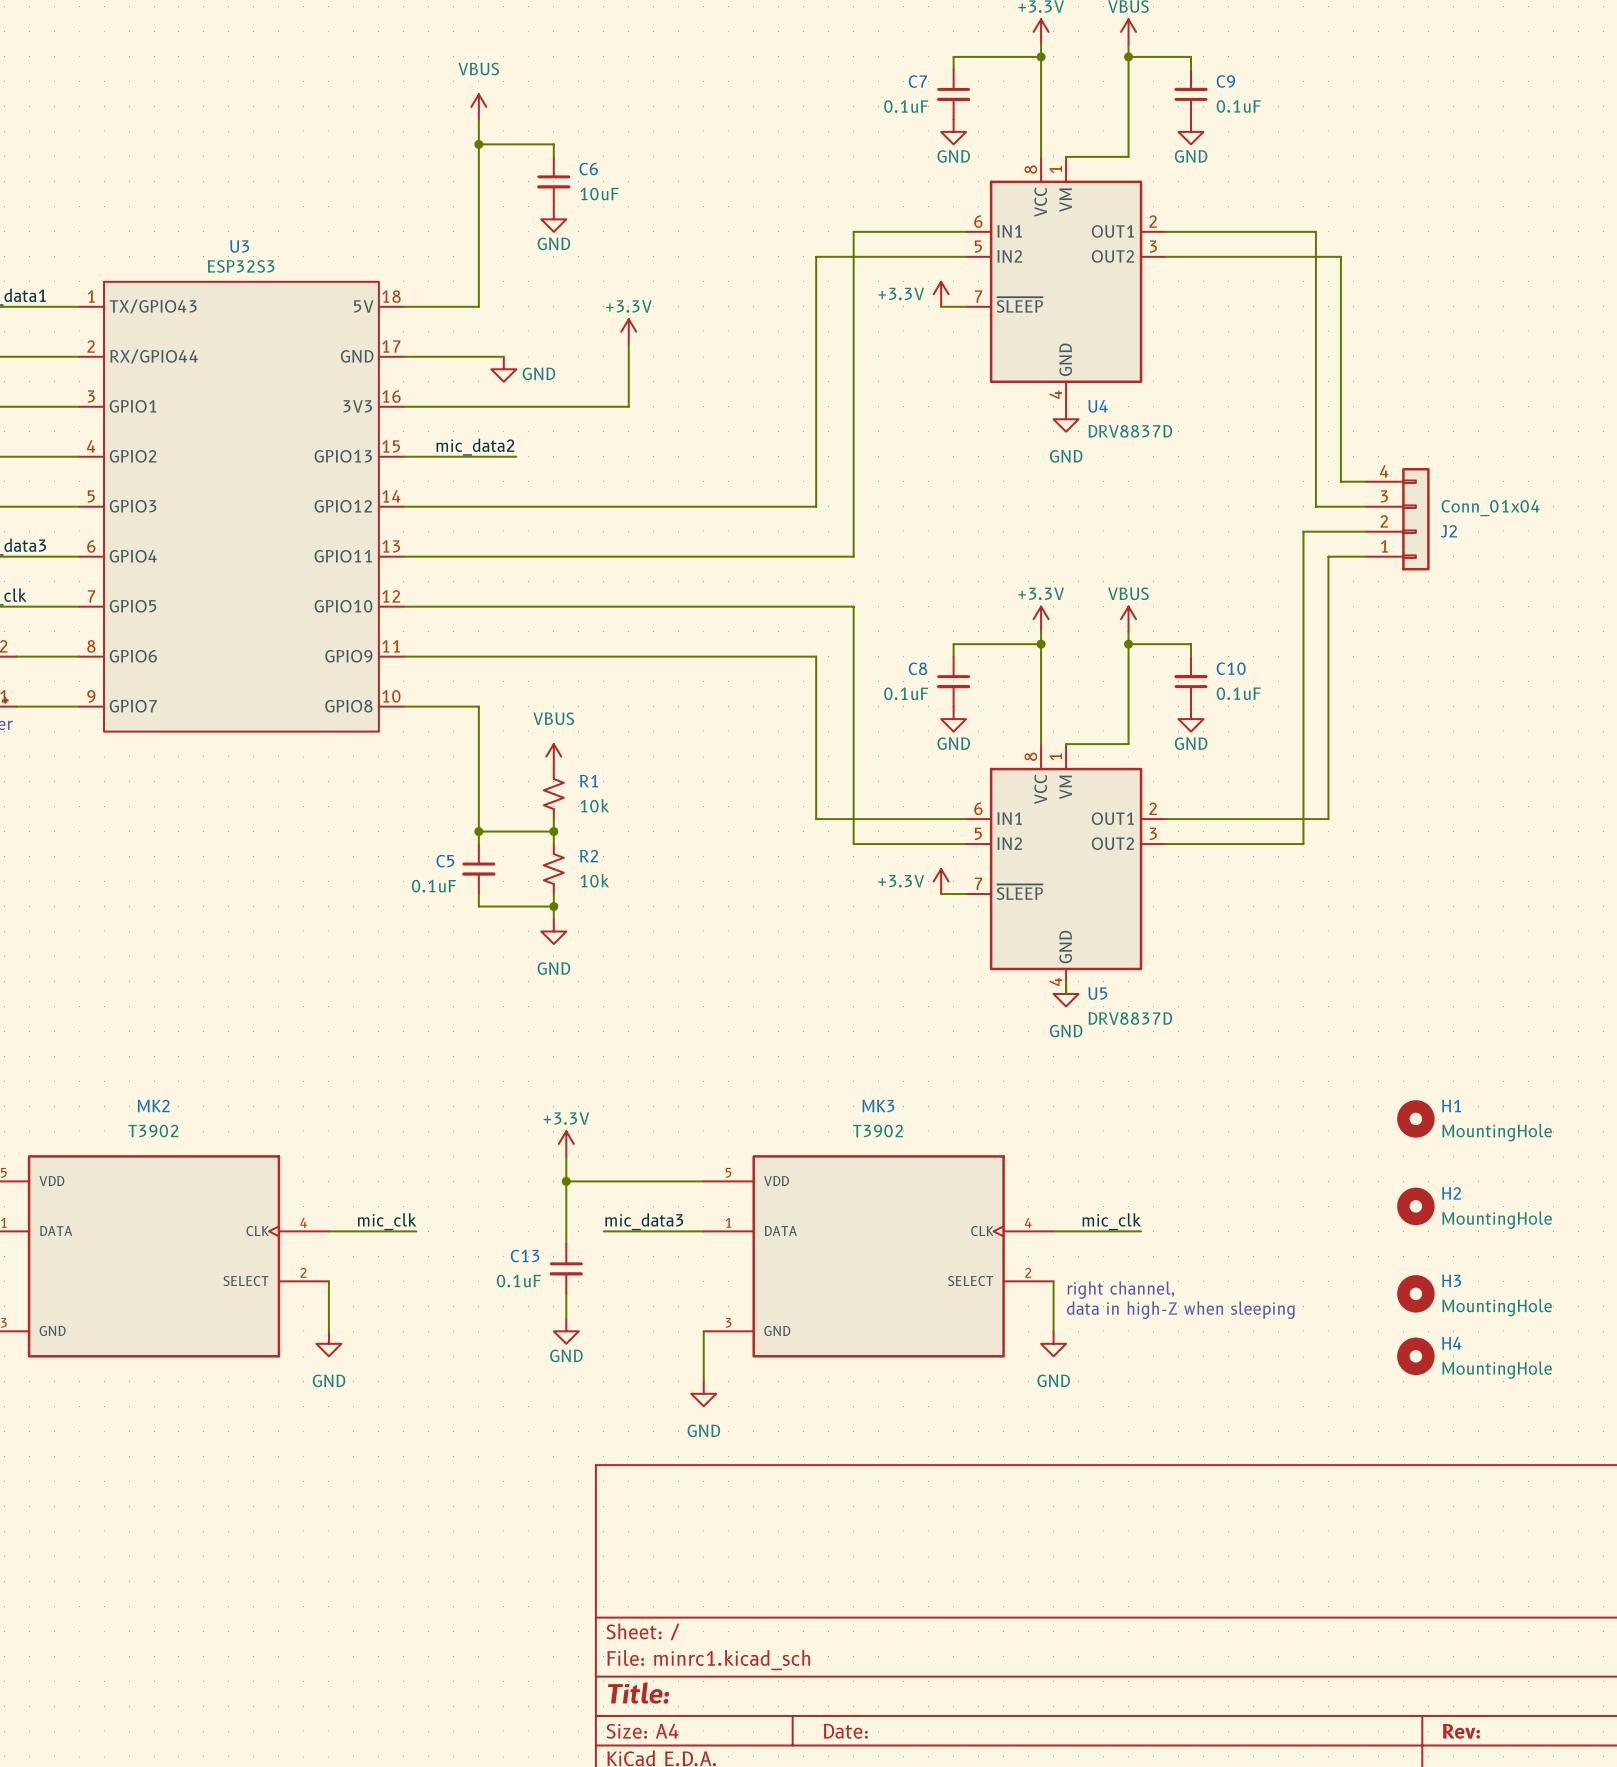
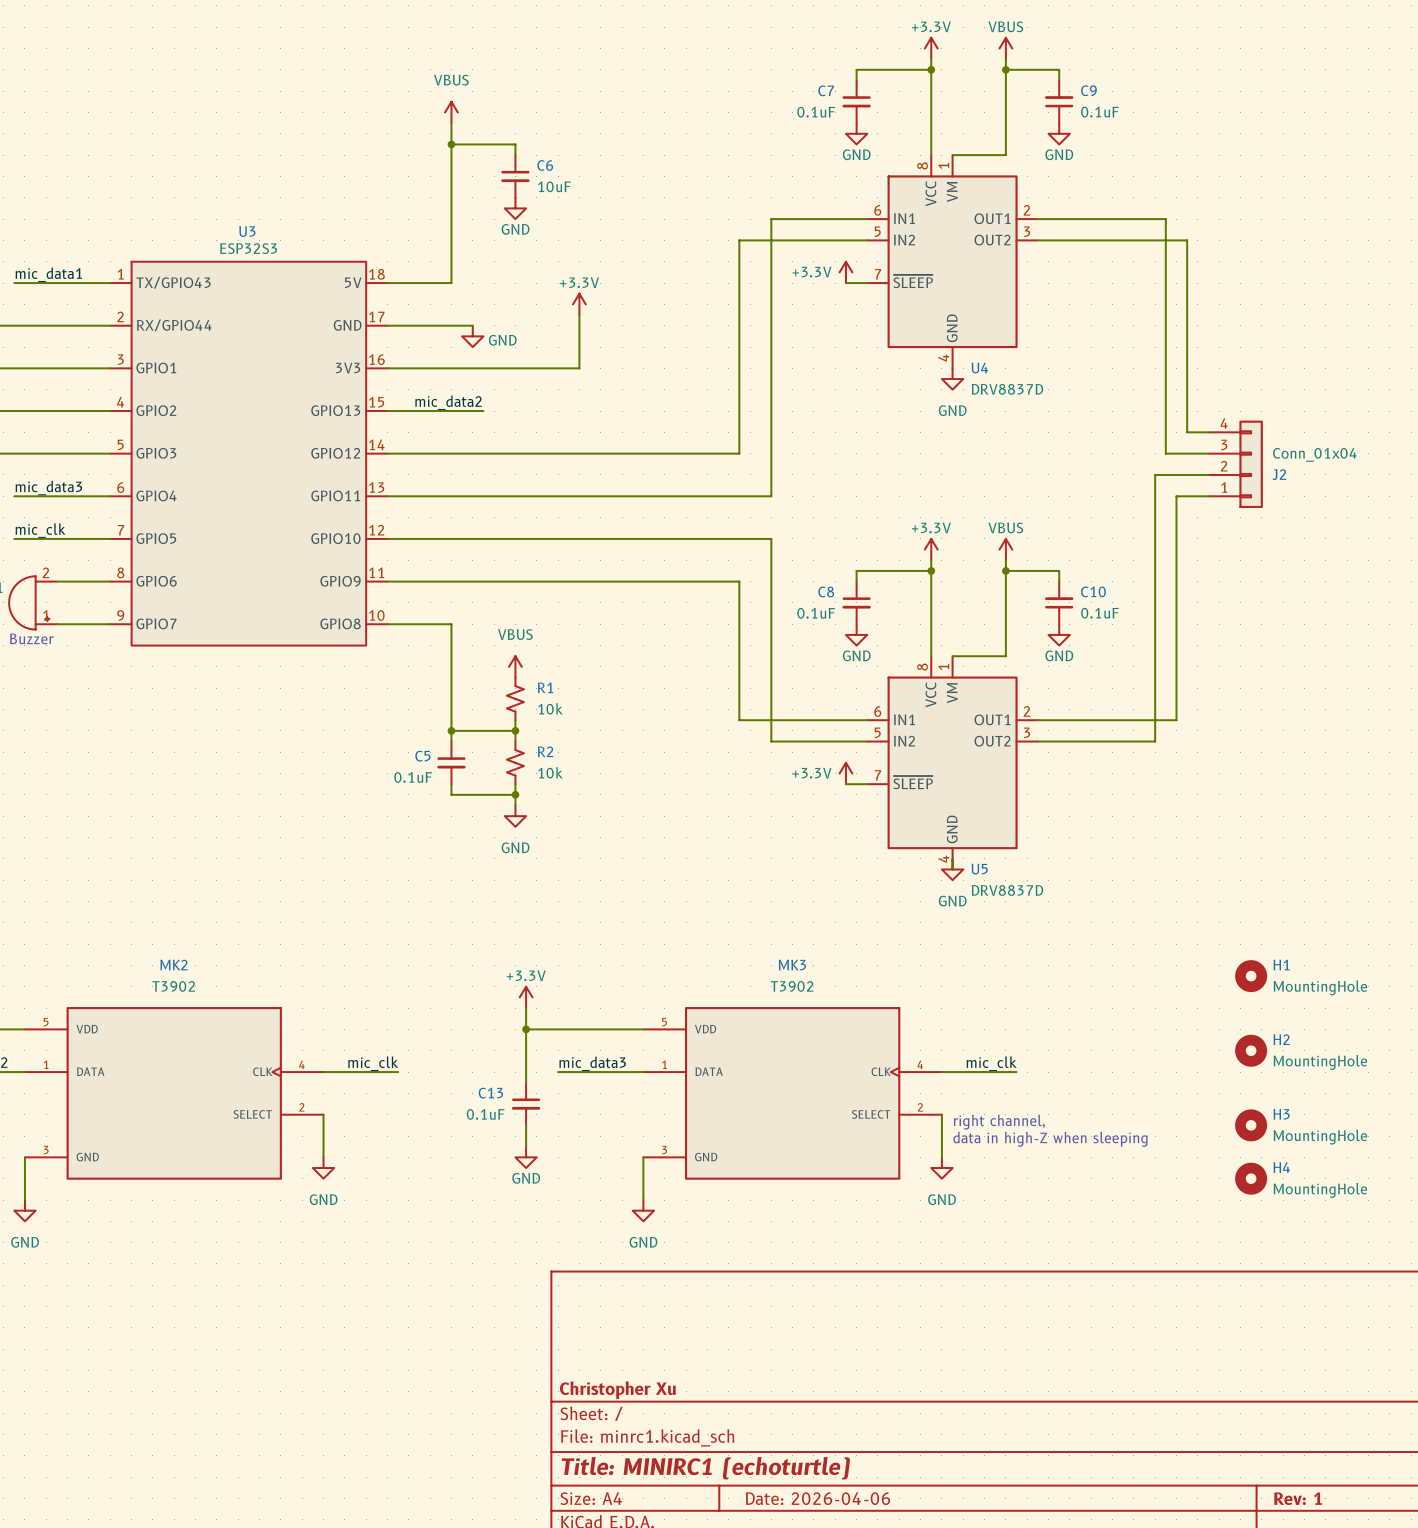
title block: none -> Christopher Xu (617, 1390)
title block: Title: (638, 1693) -> Title: MINIRC1 (echoturtle) (705, 1468)
title block: Date: (845, 1731) -> Date: 2026-04-06 (817, 1498)
title block: Rev: (1461, 1731) -> Rev: 1 (1298, 1498)

